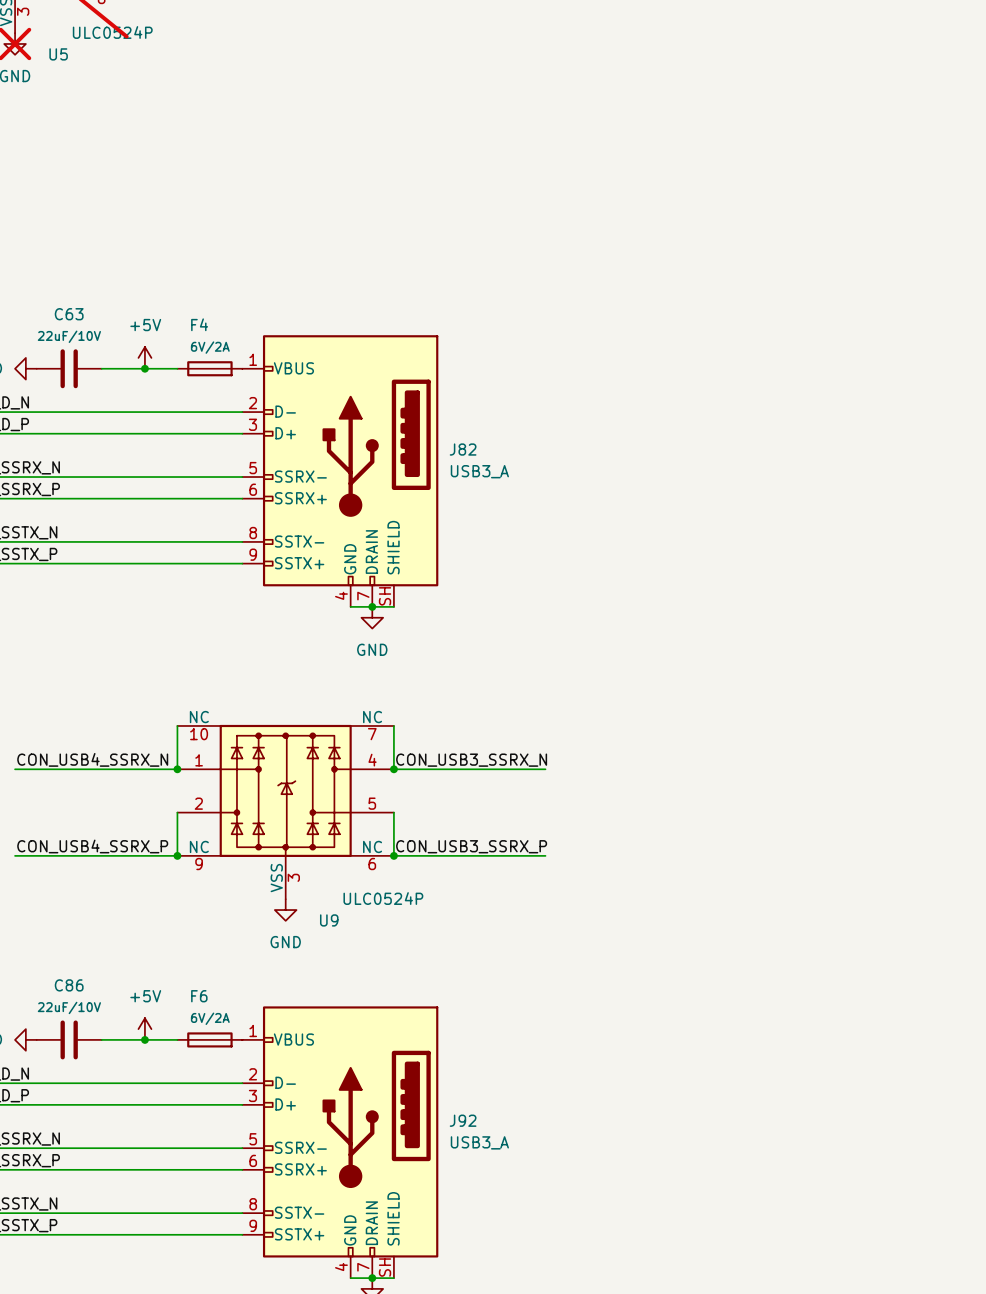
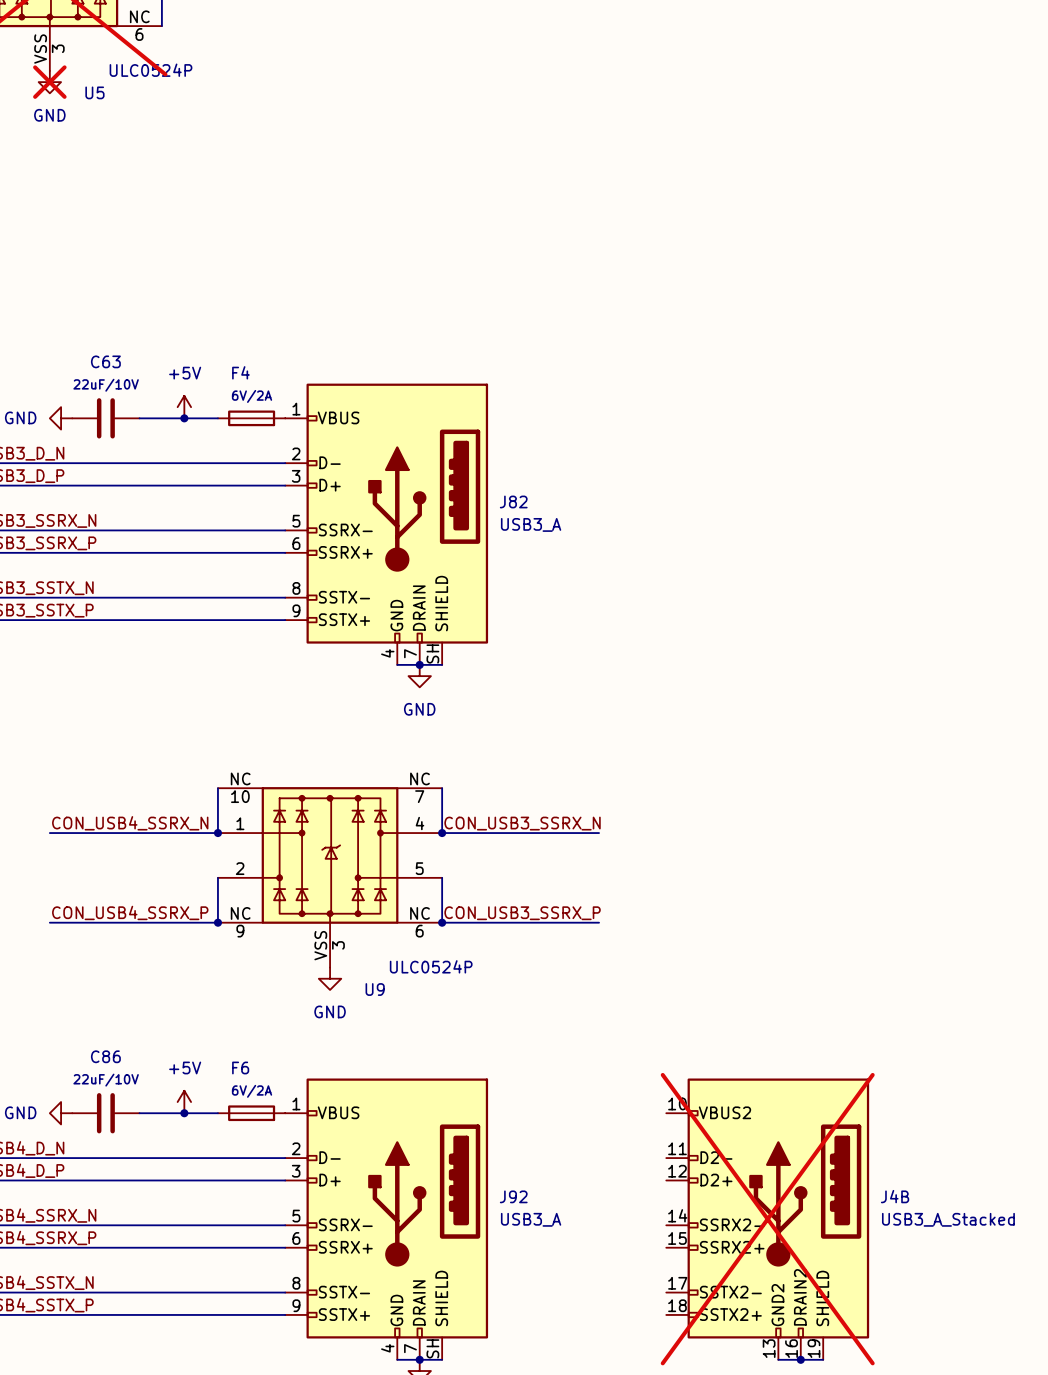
J4B: none -> USB3_A_Stacked (767, 1219)
wire: none -> (778, 1359) (823, 1359)
junction: none -> (800, 1359)

